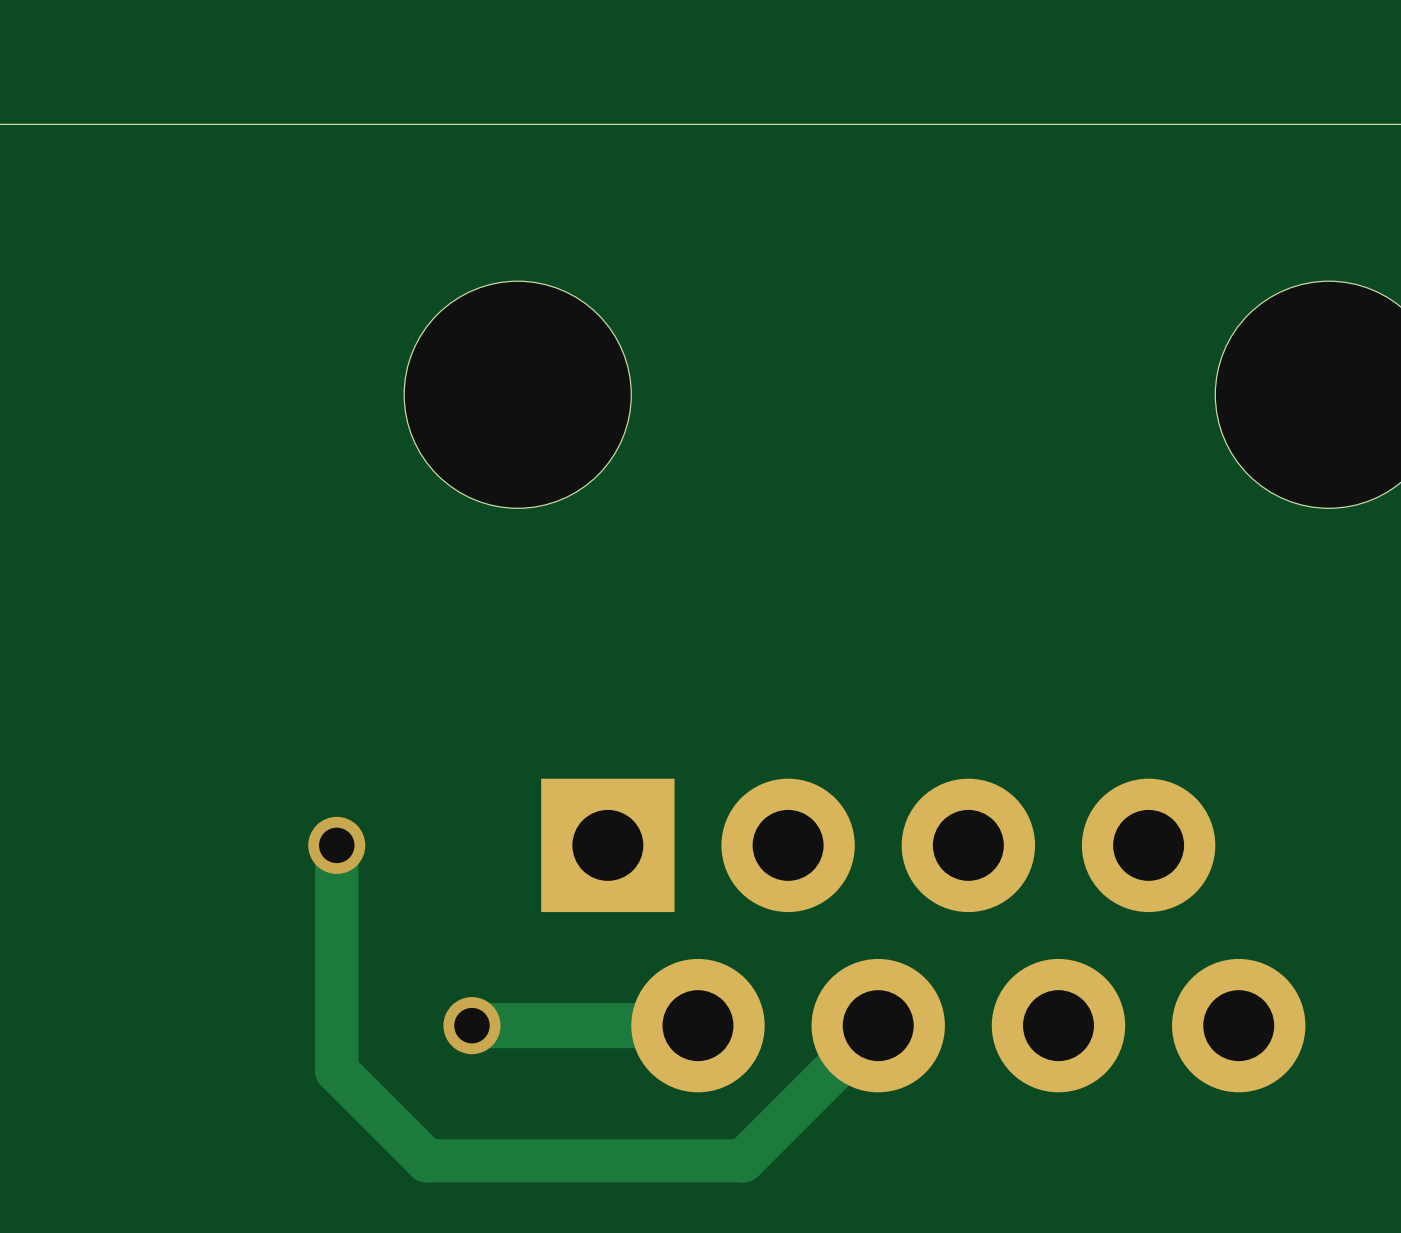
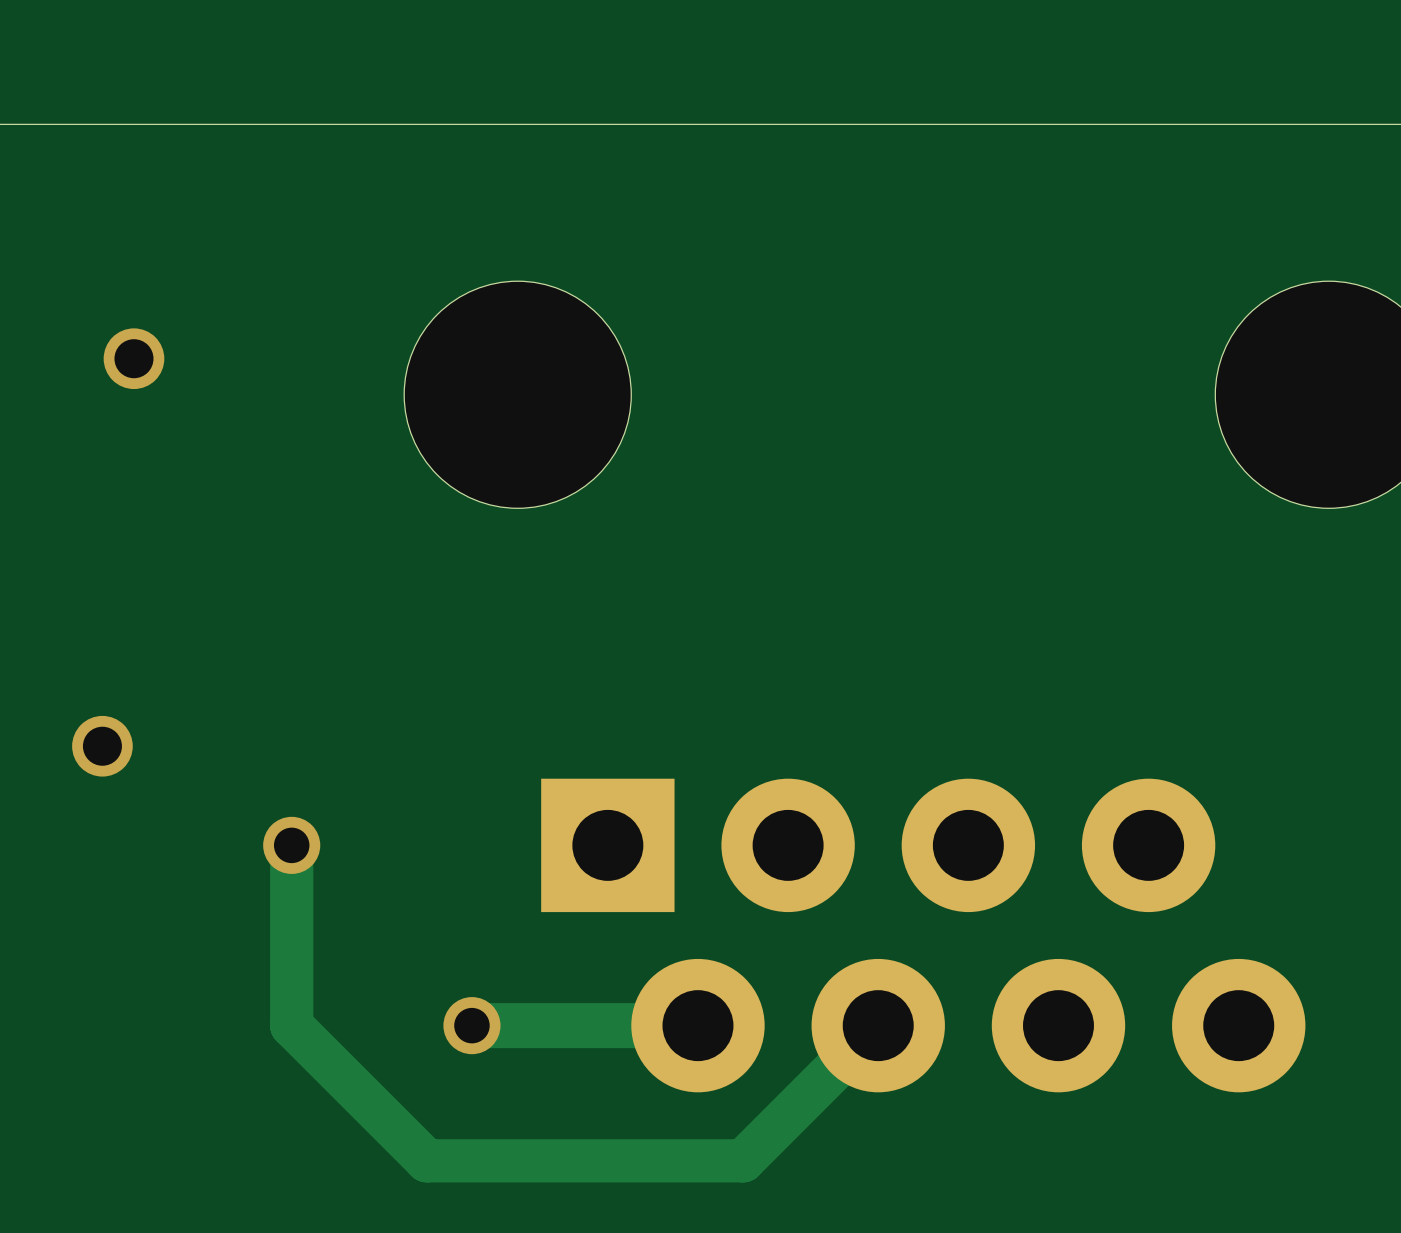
via: none -> (133, 358)
via: none -> (102, 746)
track: (336, 845) (336, 1070) -> (291, 845) (291, 1025) (336, 1070)
via position: (336, 845) -> (291, 845)

